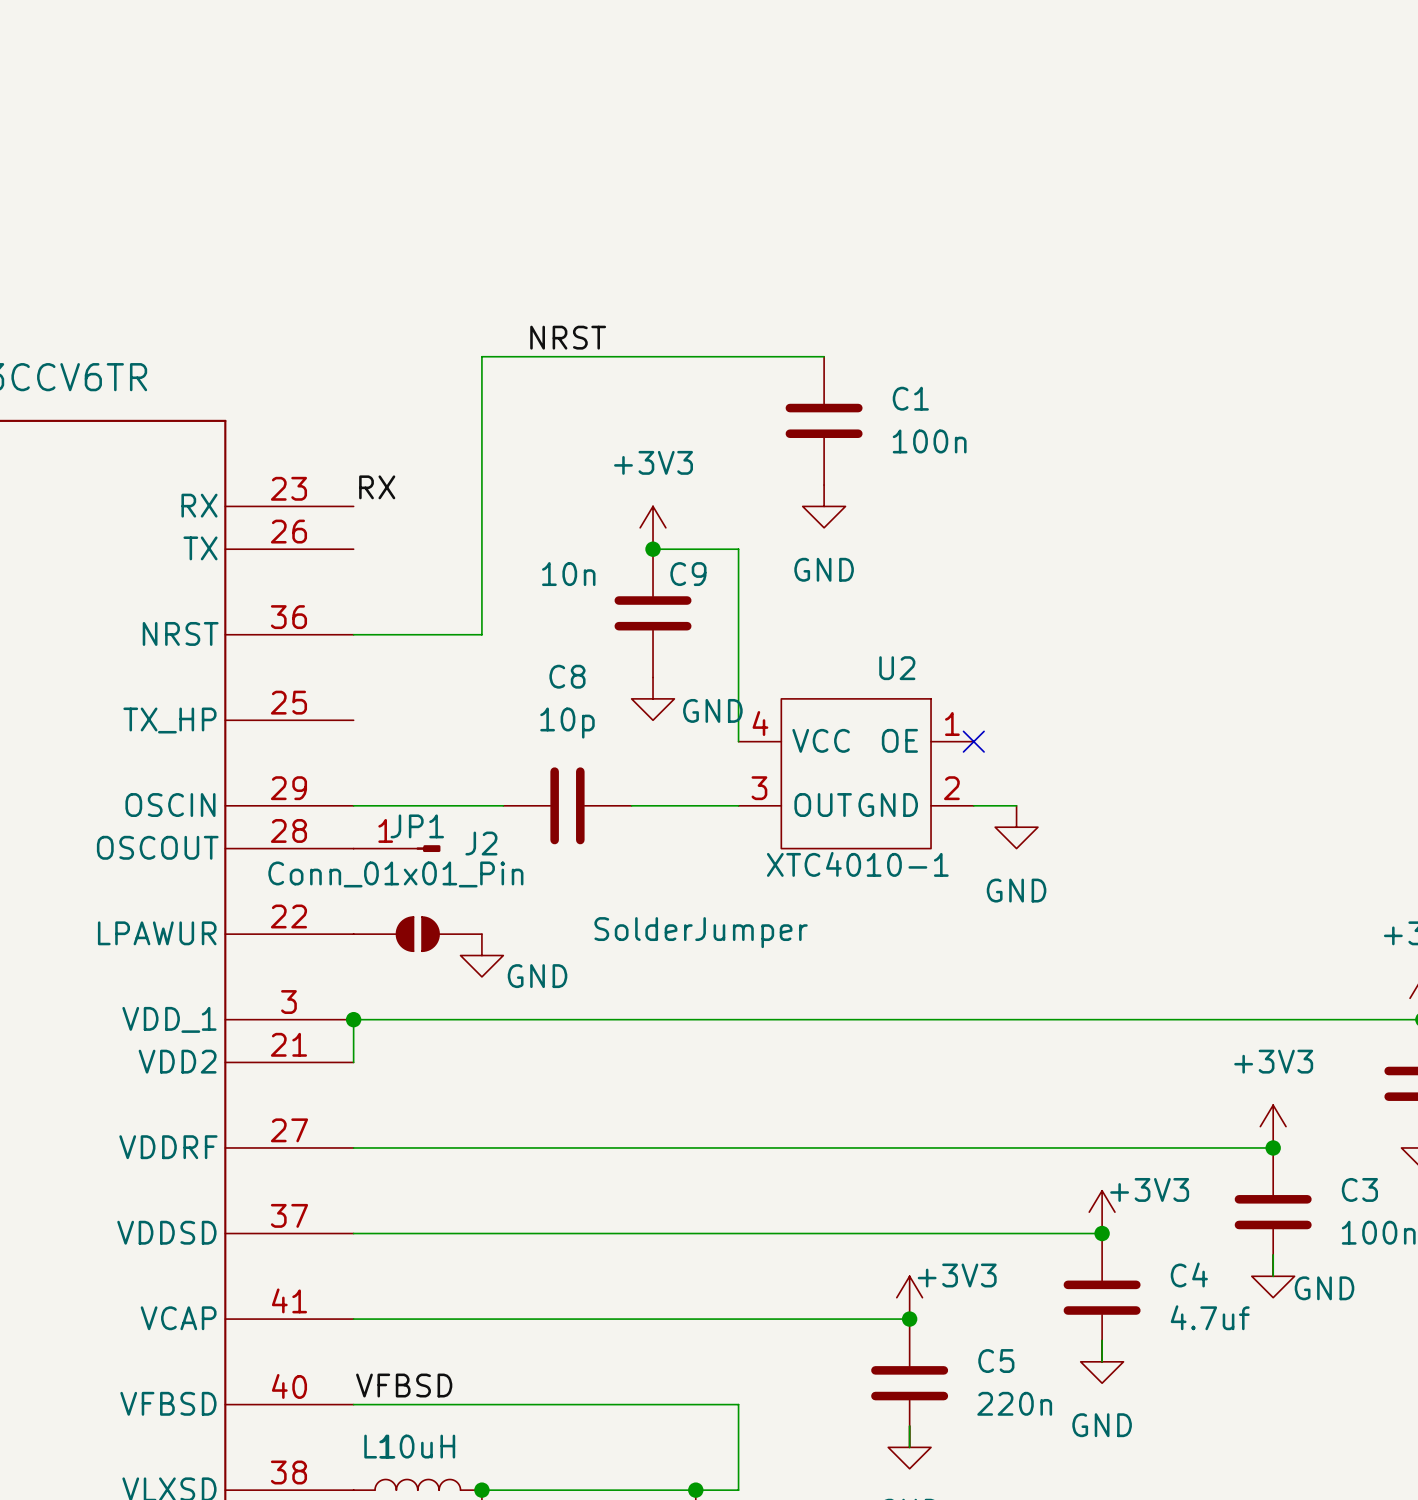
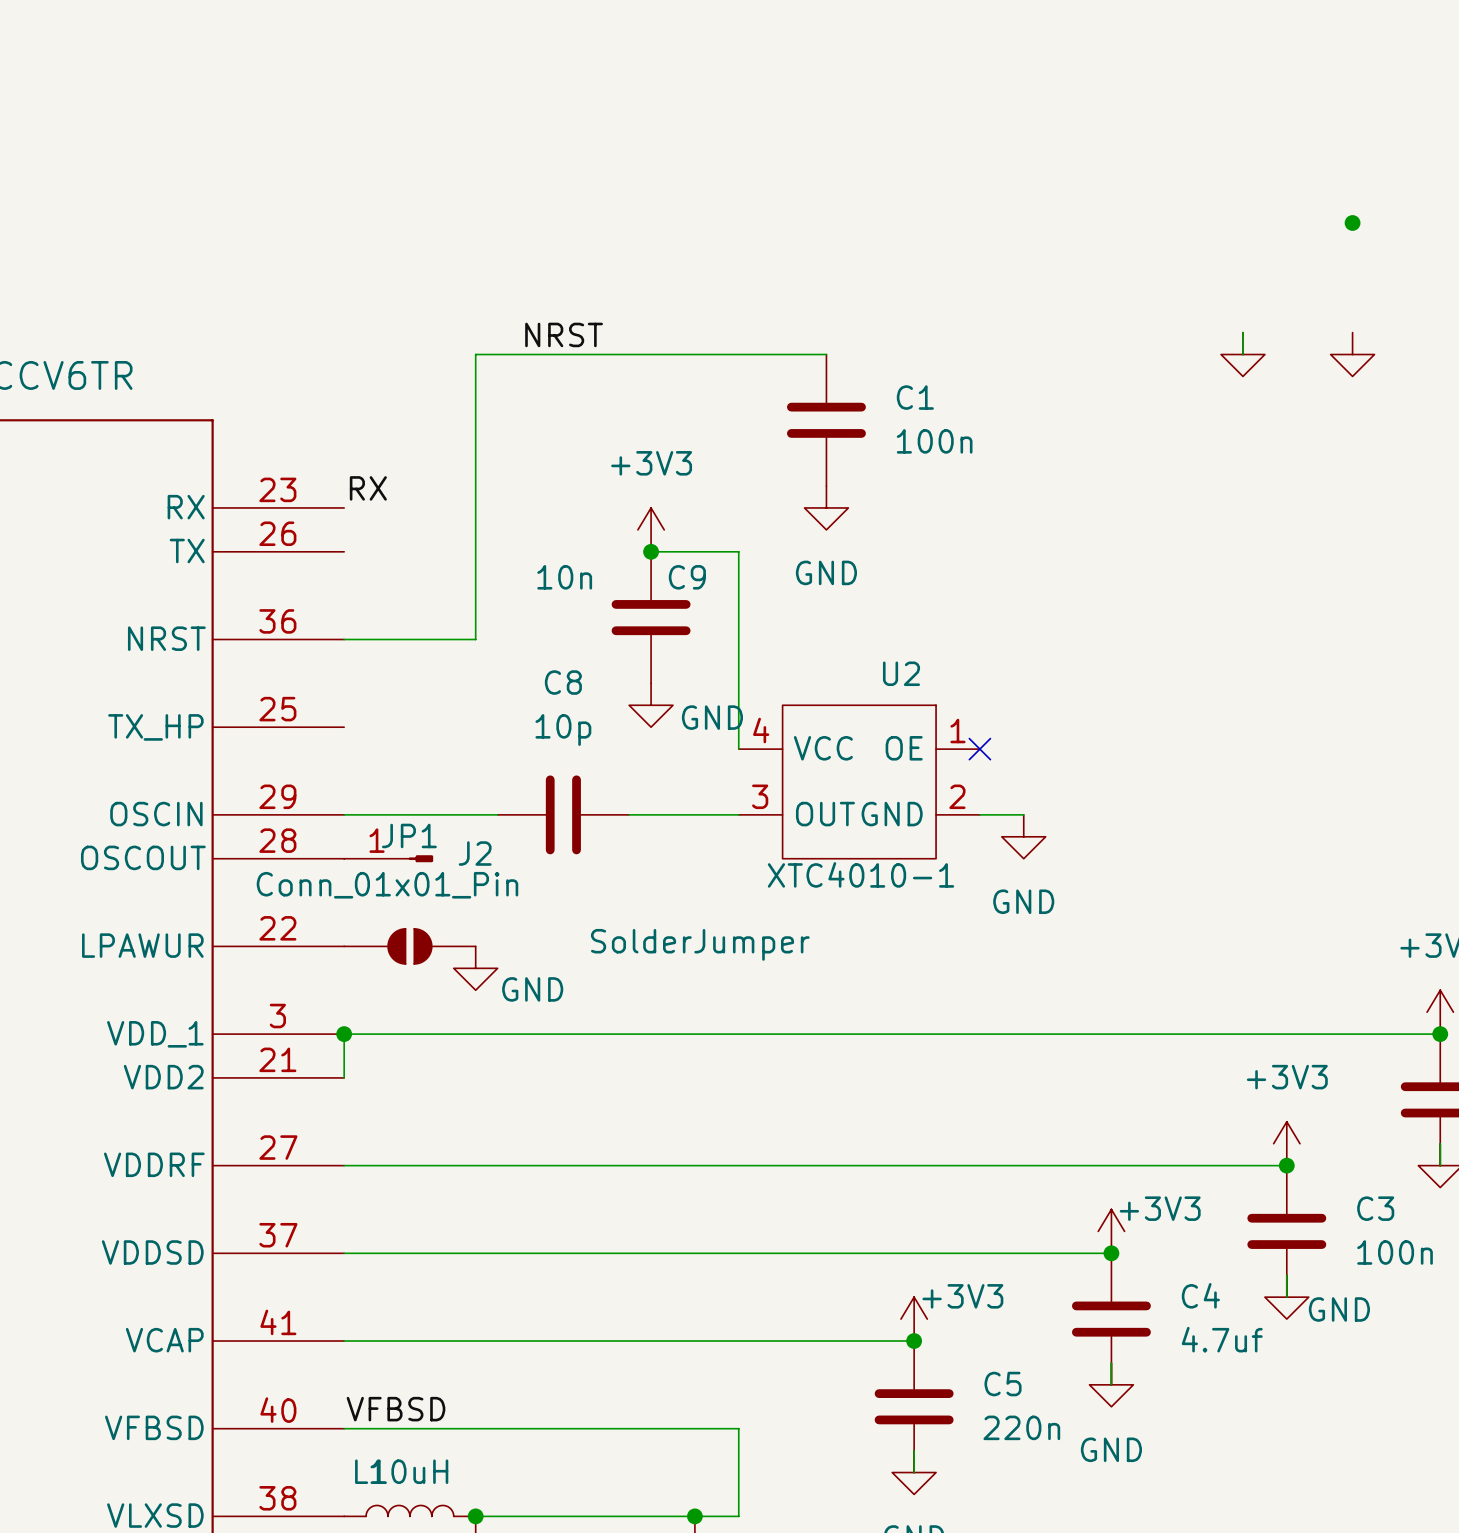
junction: none -> (1352, 222)
wire: none -> (1242, 332) (1242, 354)
power symbol: none -> (1242, 354)
power symbol: none -> (1352, 354)

